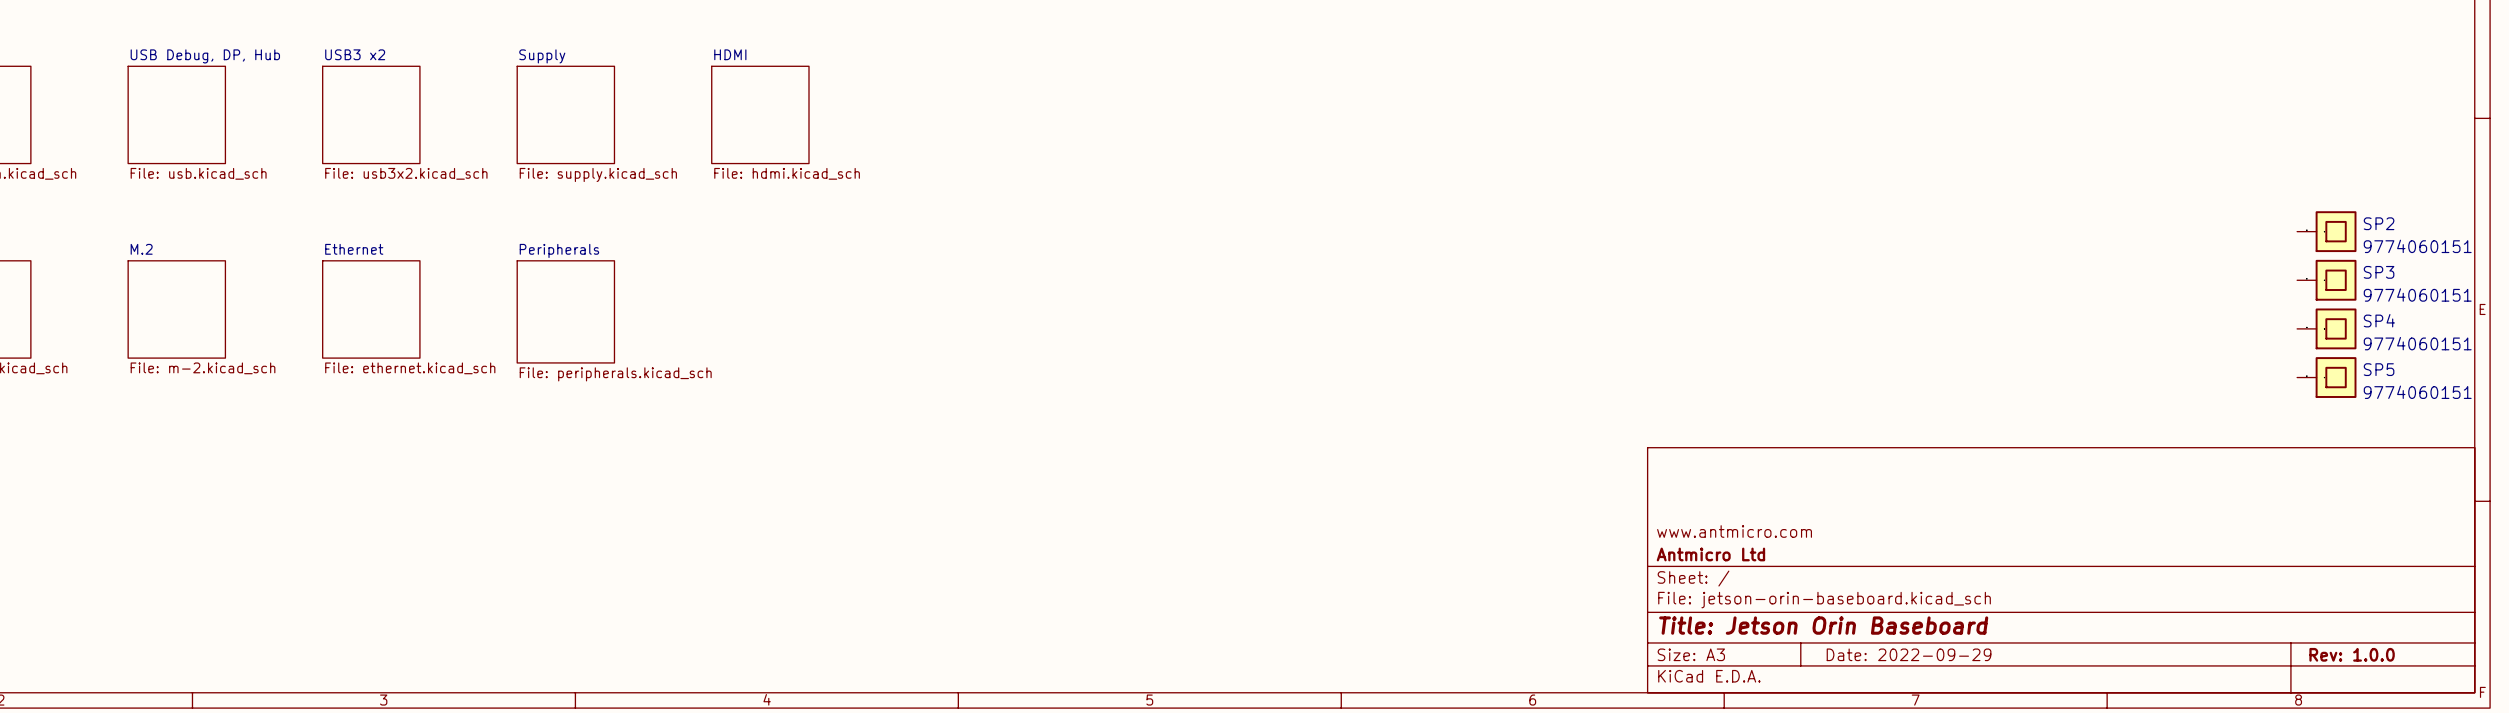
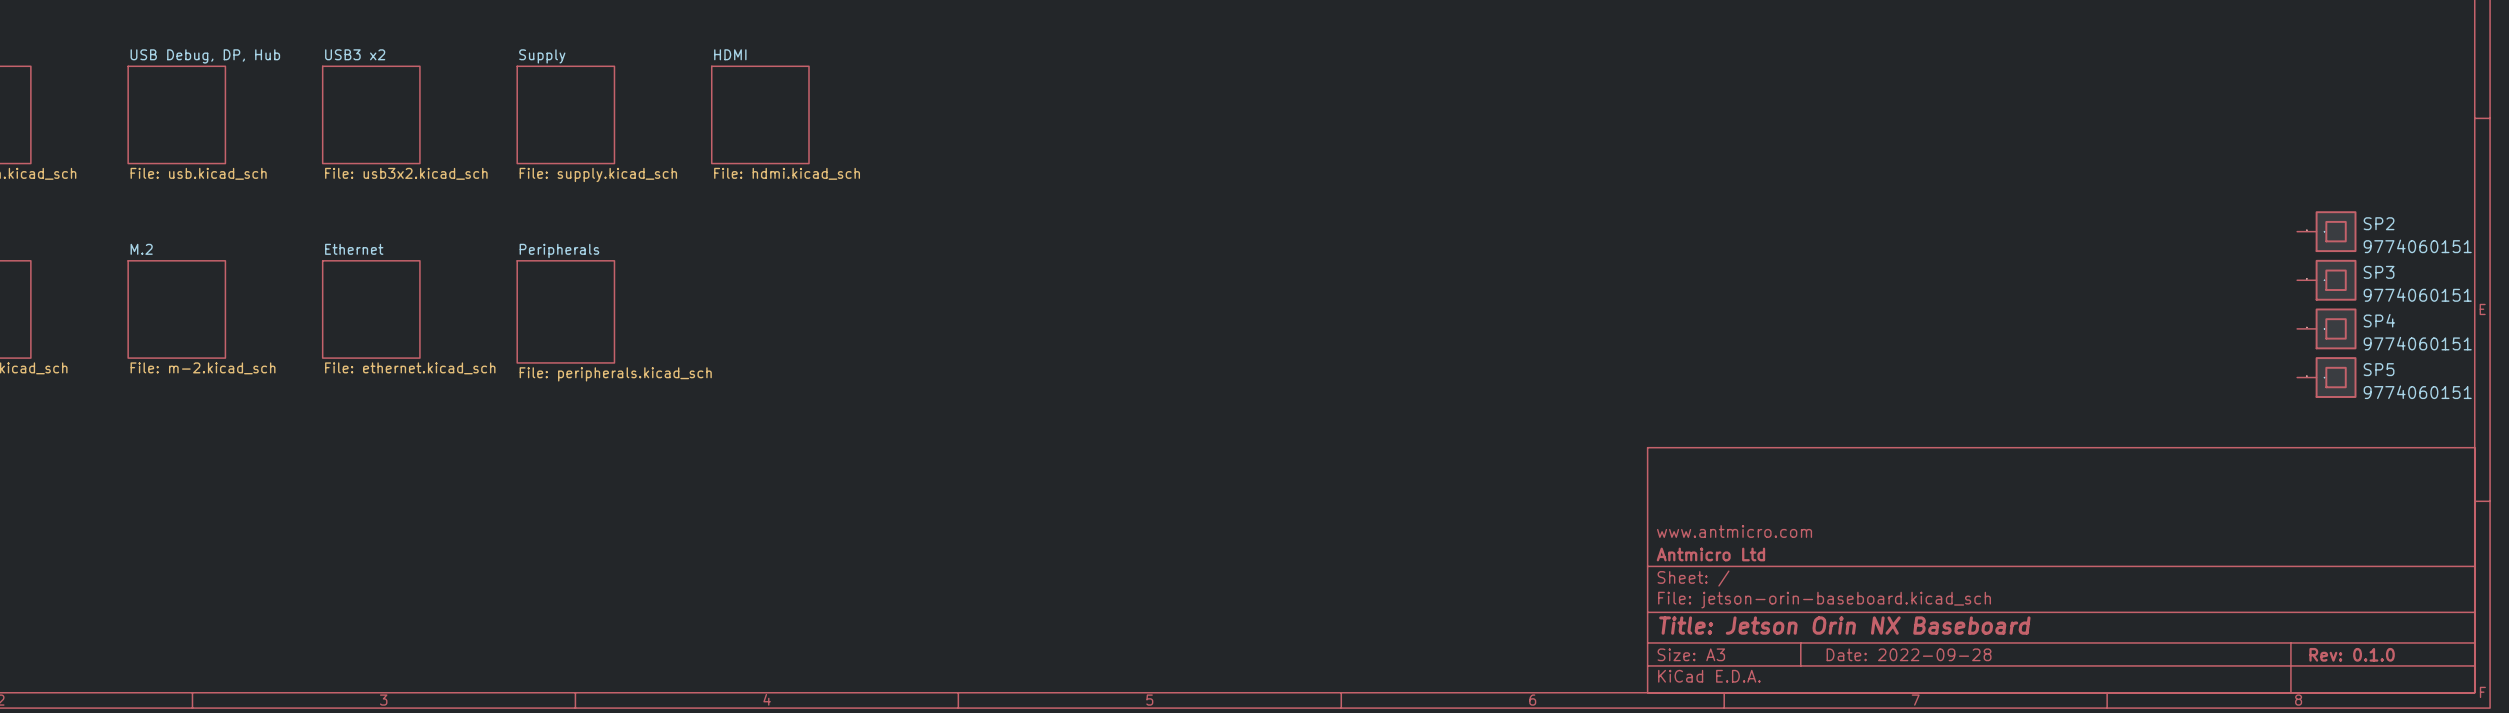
title block: Title: Jetson Orin Baseboard (1823, 625) -> Title: Jetson Orin NX Baseboard (1844, 625)
title block: Date: 2022-09-29 (1909, 654) -> Date: 2022-09-28 (1909, 654)
title block: Rev: 1.0.0 (2352, 654) -> Rev: 0.1.0 (2352, 654)

